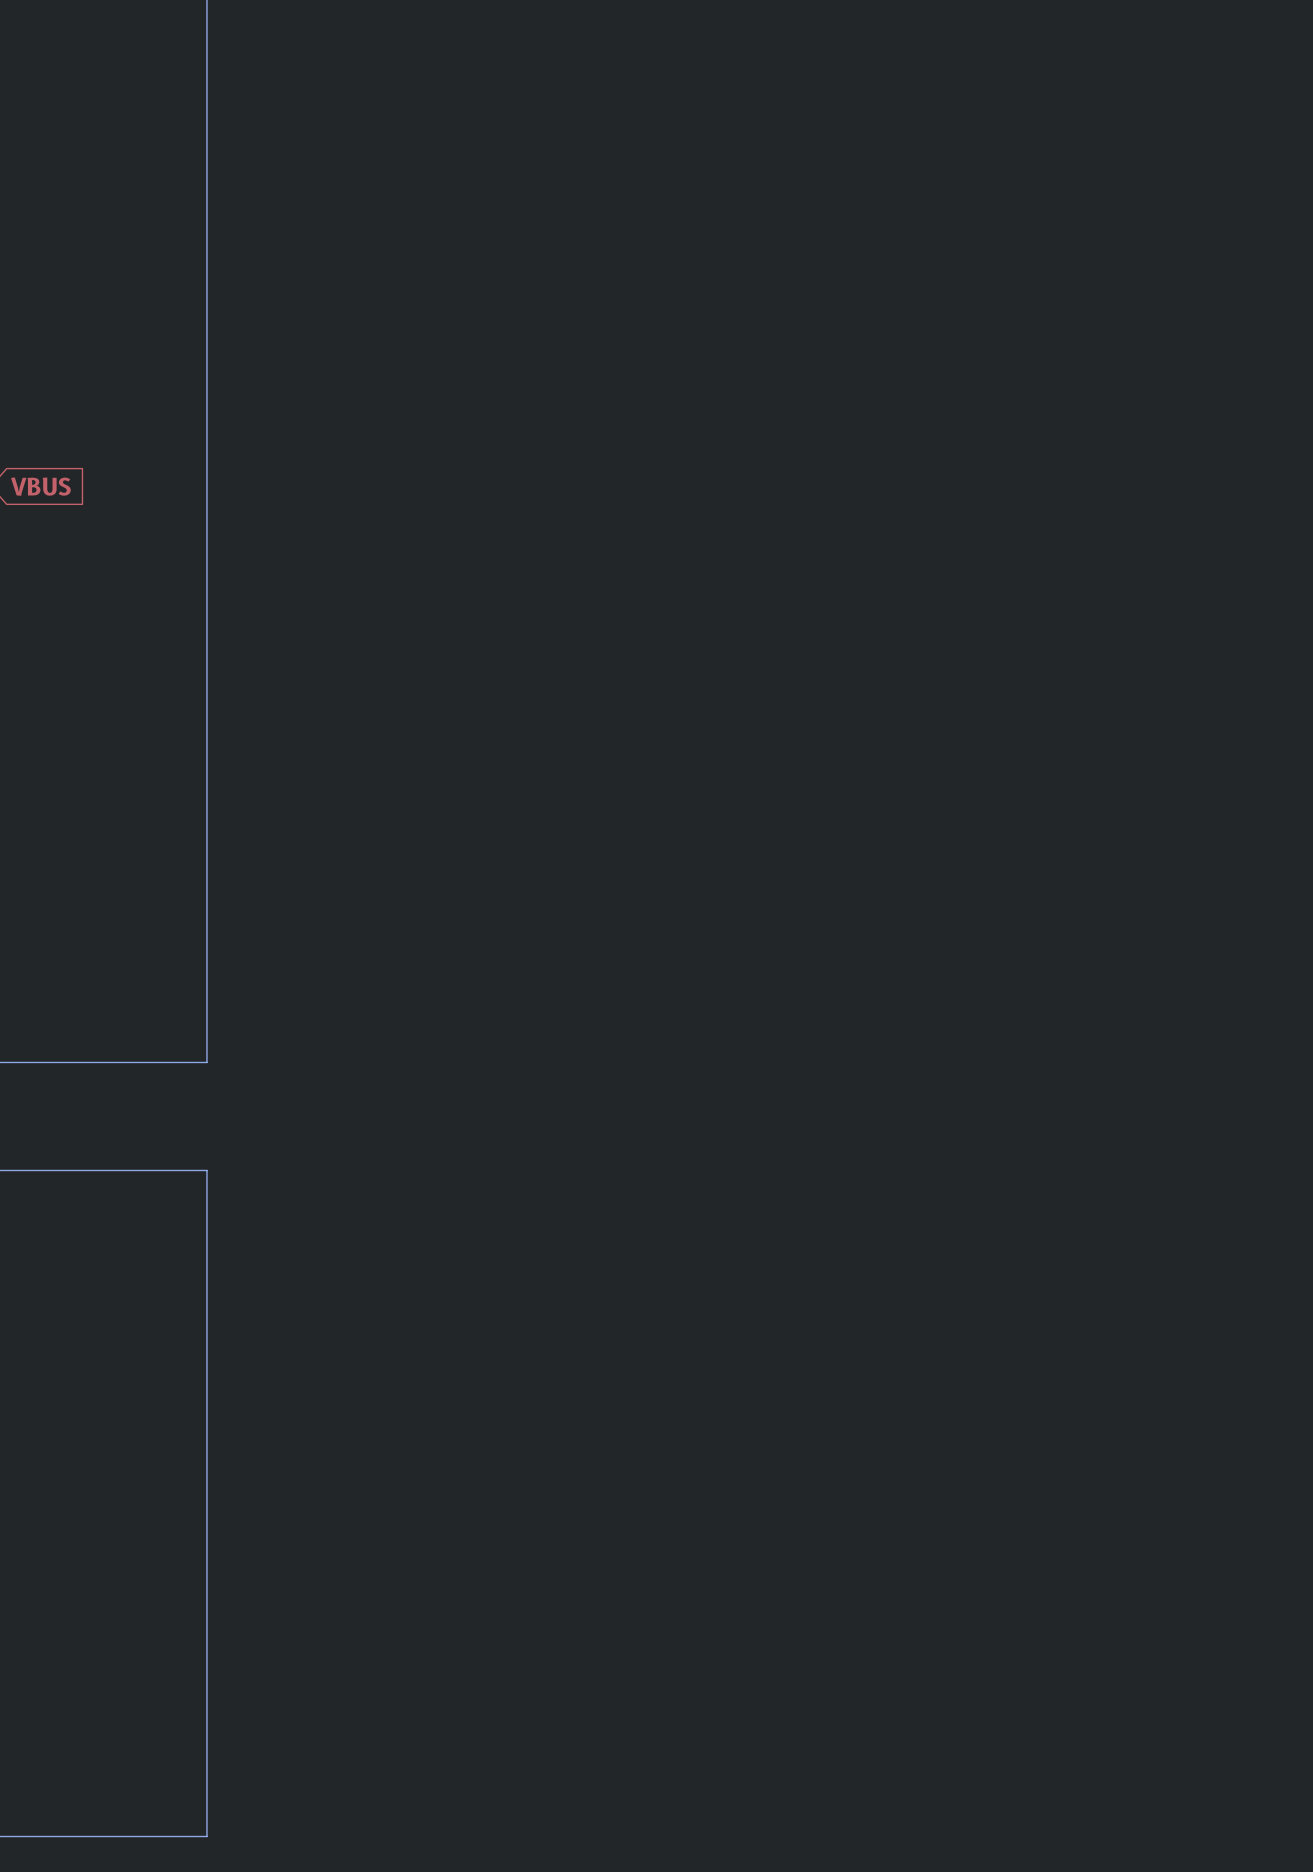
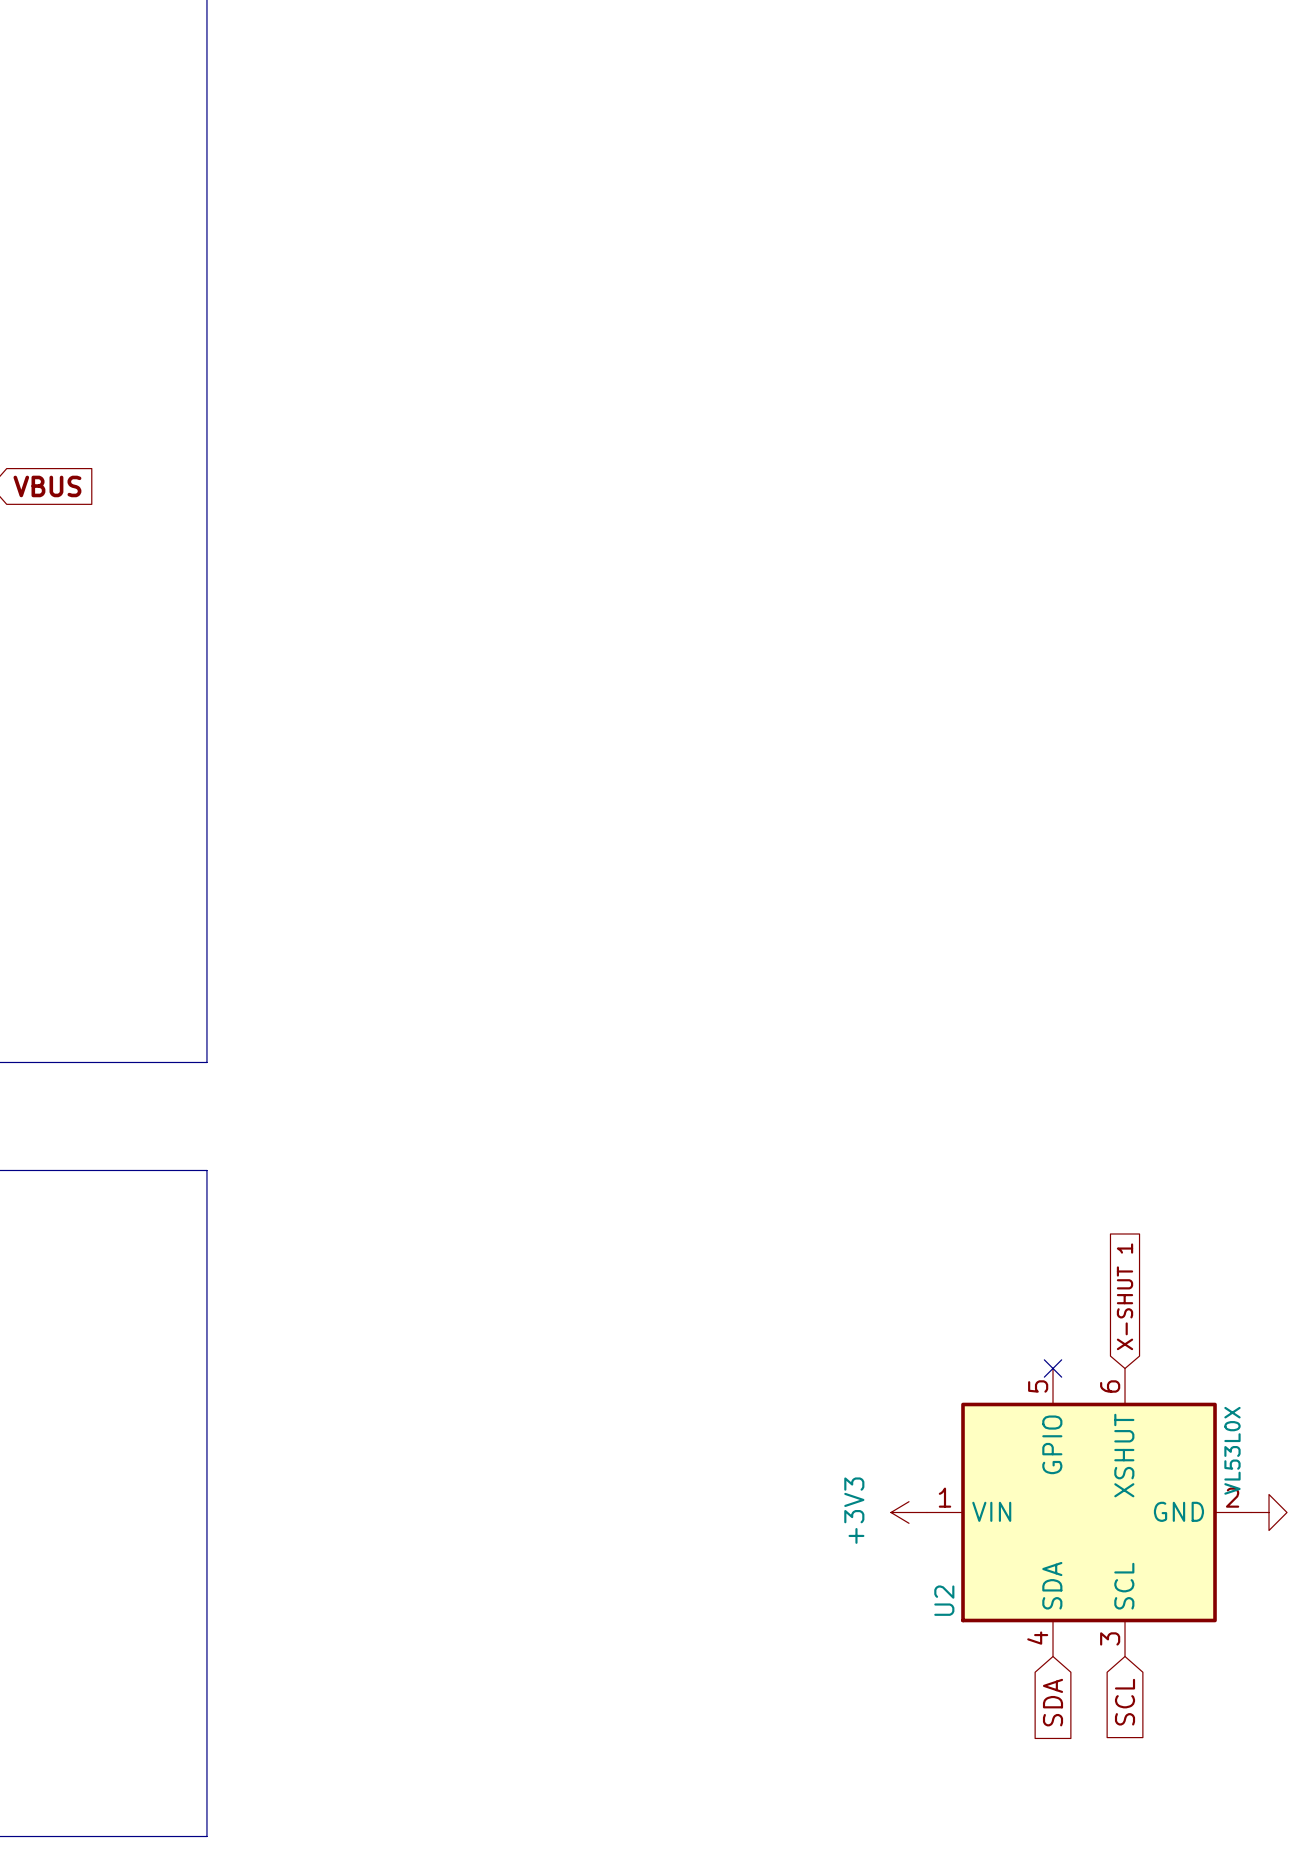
global label: none -> X-SHUT 1 (1125, 1296)
no-connect mark: none -> (1053, 1368)
power symbol: none -> +3V3 (909, 1512)
U2: none -> VL53L0X (1089, 1512)
power symbol: none -> (1269, 1512)
global label: none -> SCL (1125, 1702)
global label: none -> SDA (1053, 1702)

